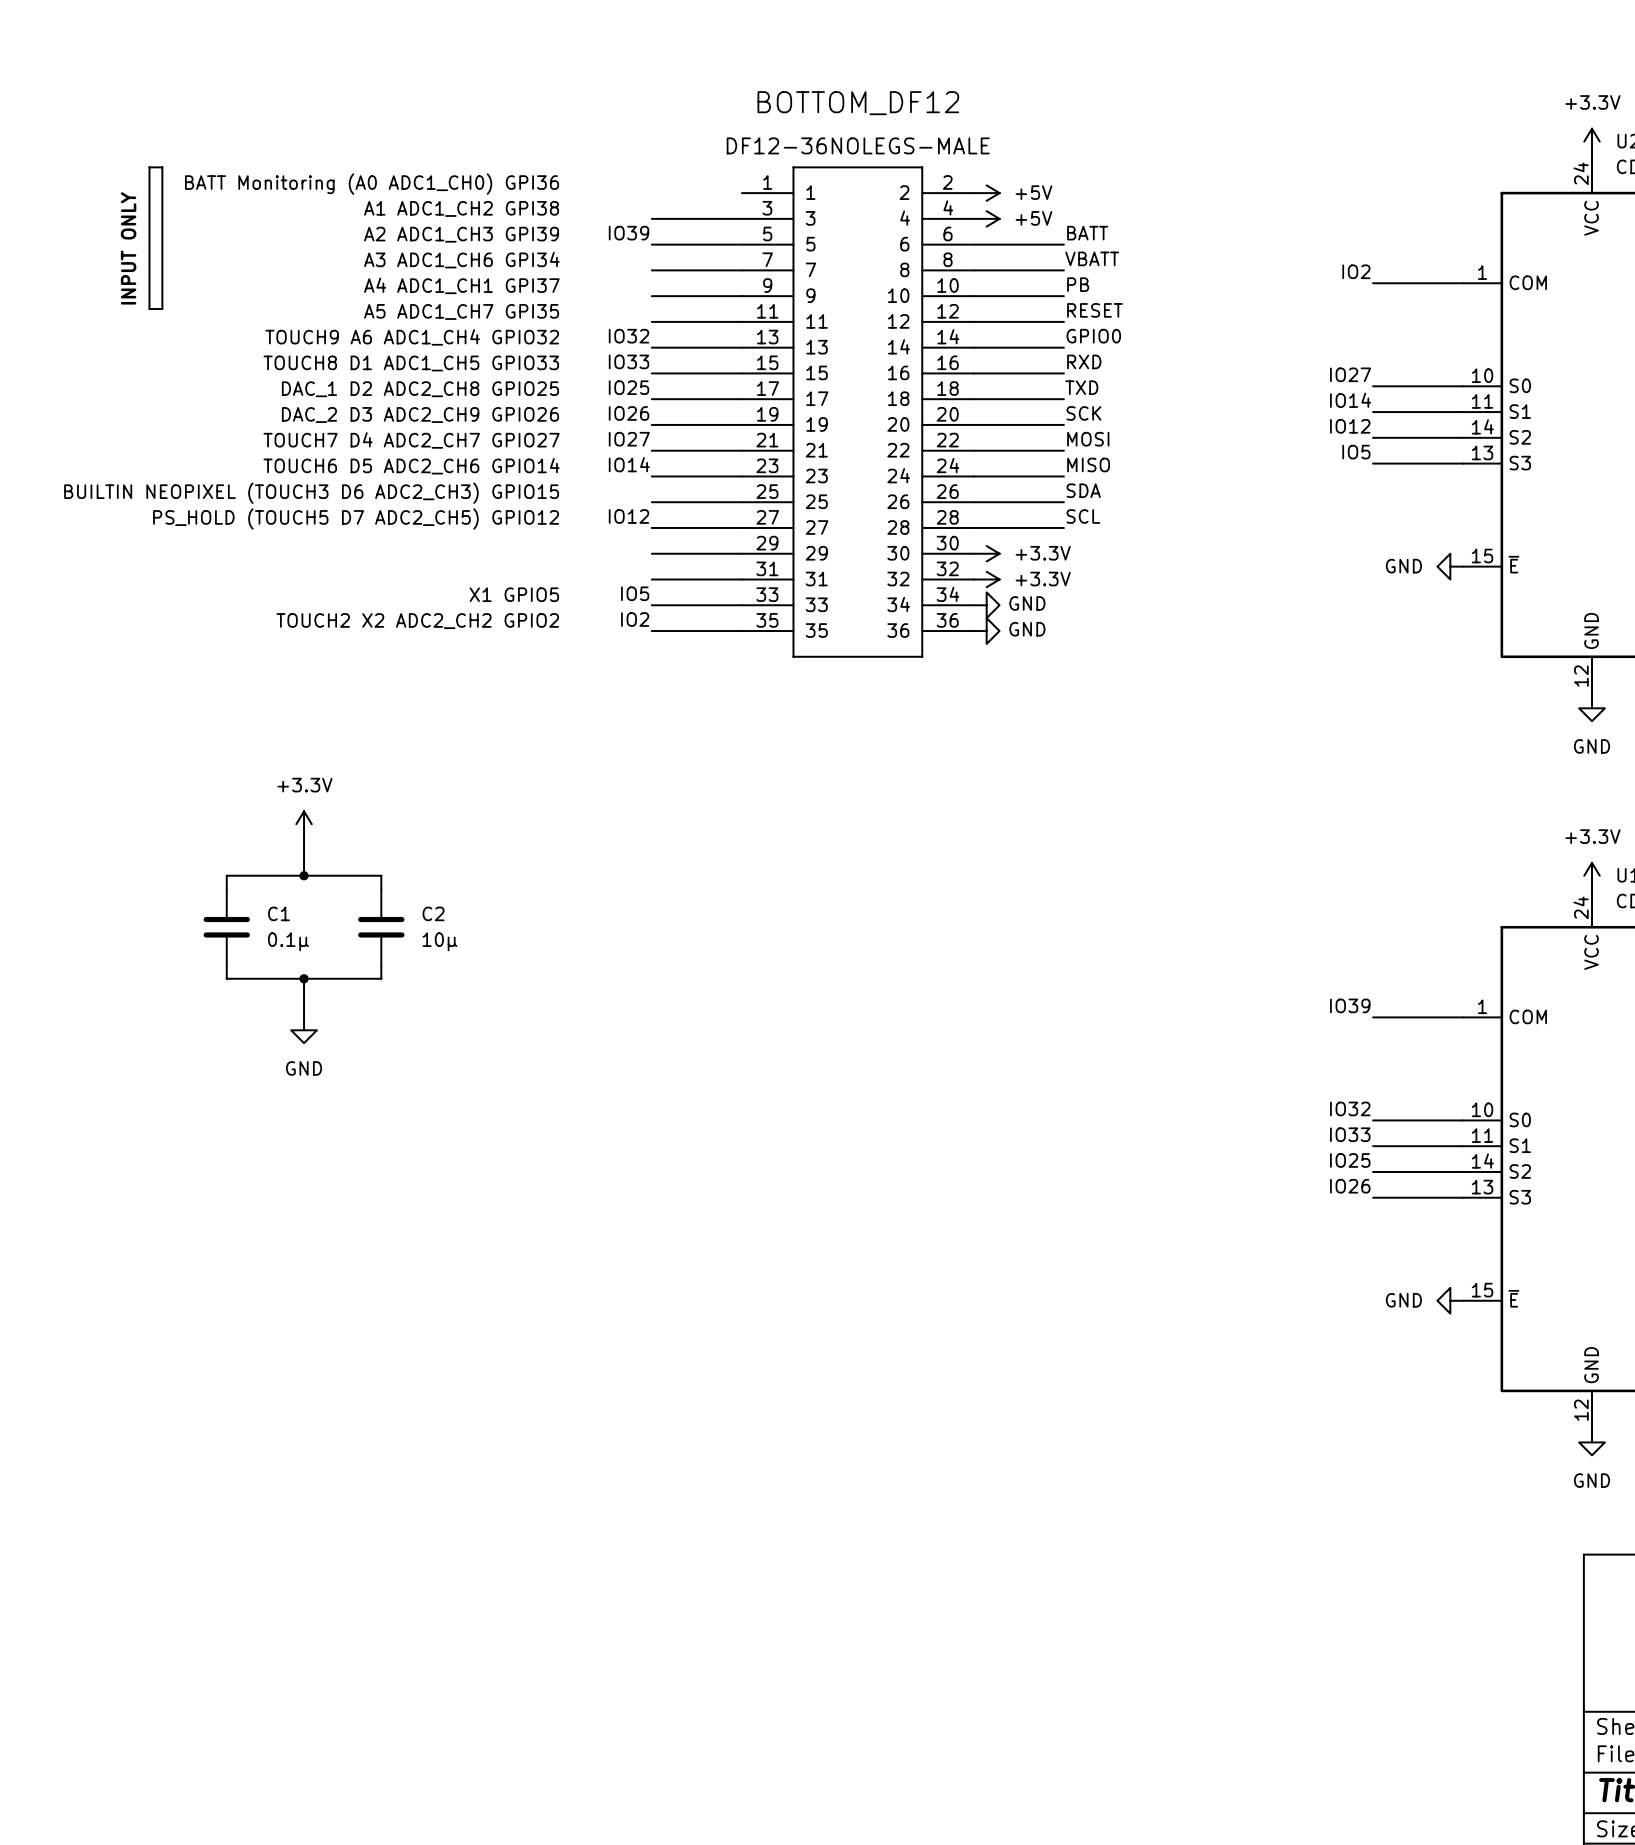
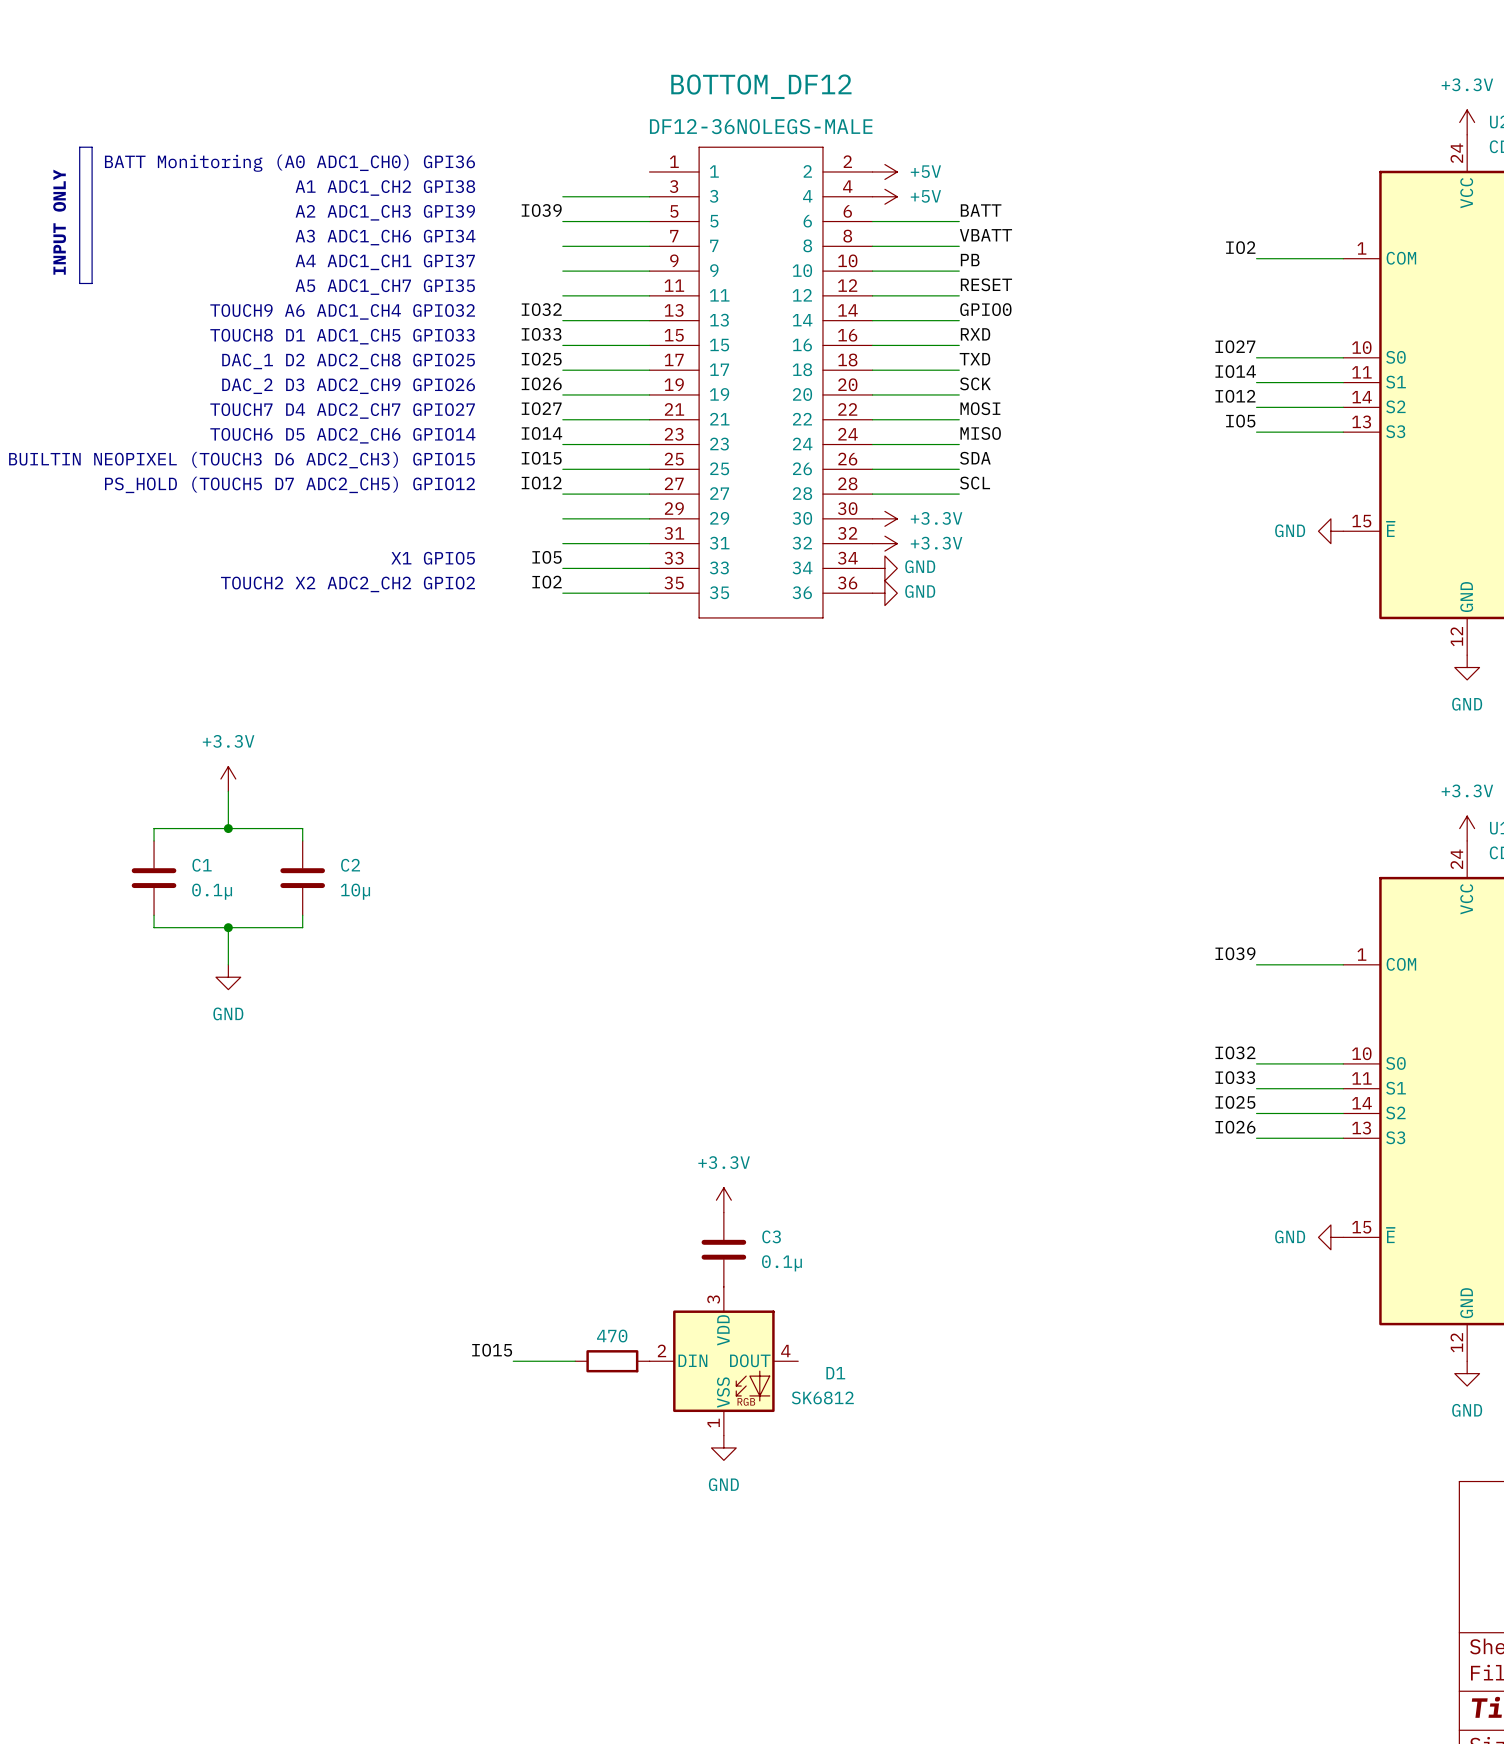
label: none -> IO15 (541, 458)
power symbol: none -> +3.3V (723, 1200)
C3: none -> 0.1µ (723, 1249)
label: none -> IO15 (492, 1350)
wire: none -> (513, 1361) (575, 1361)
part: none -> 470 (612, 1361)
D1: none -> SK6812 (723, 1361)
power symbol: none -> GND (723, 1447)

